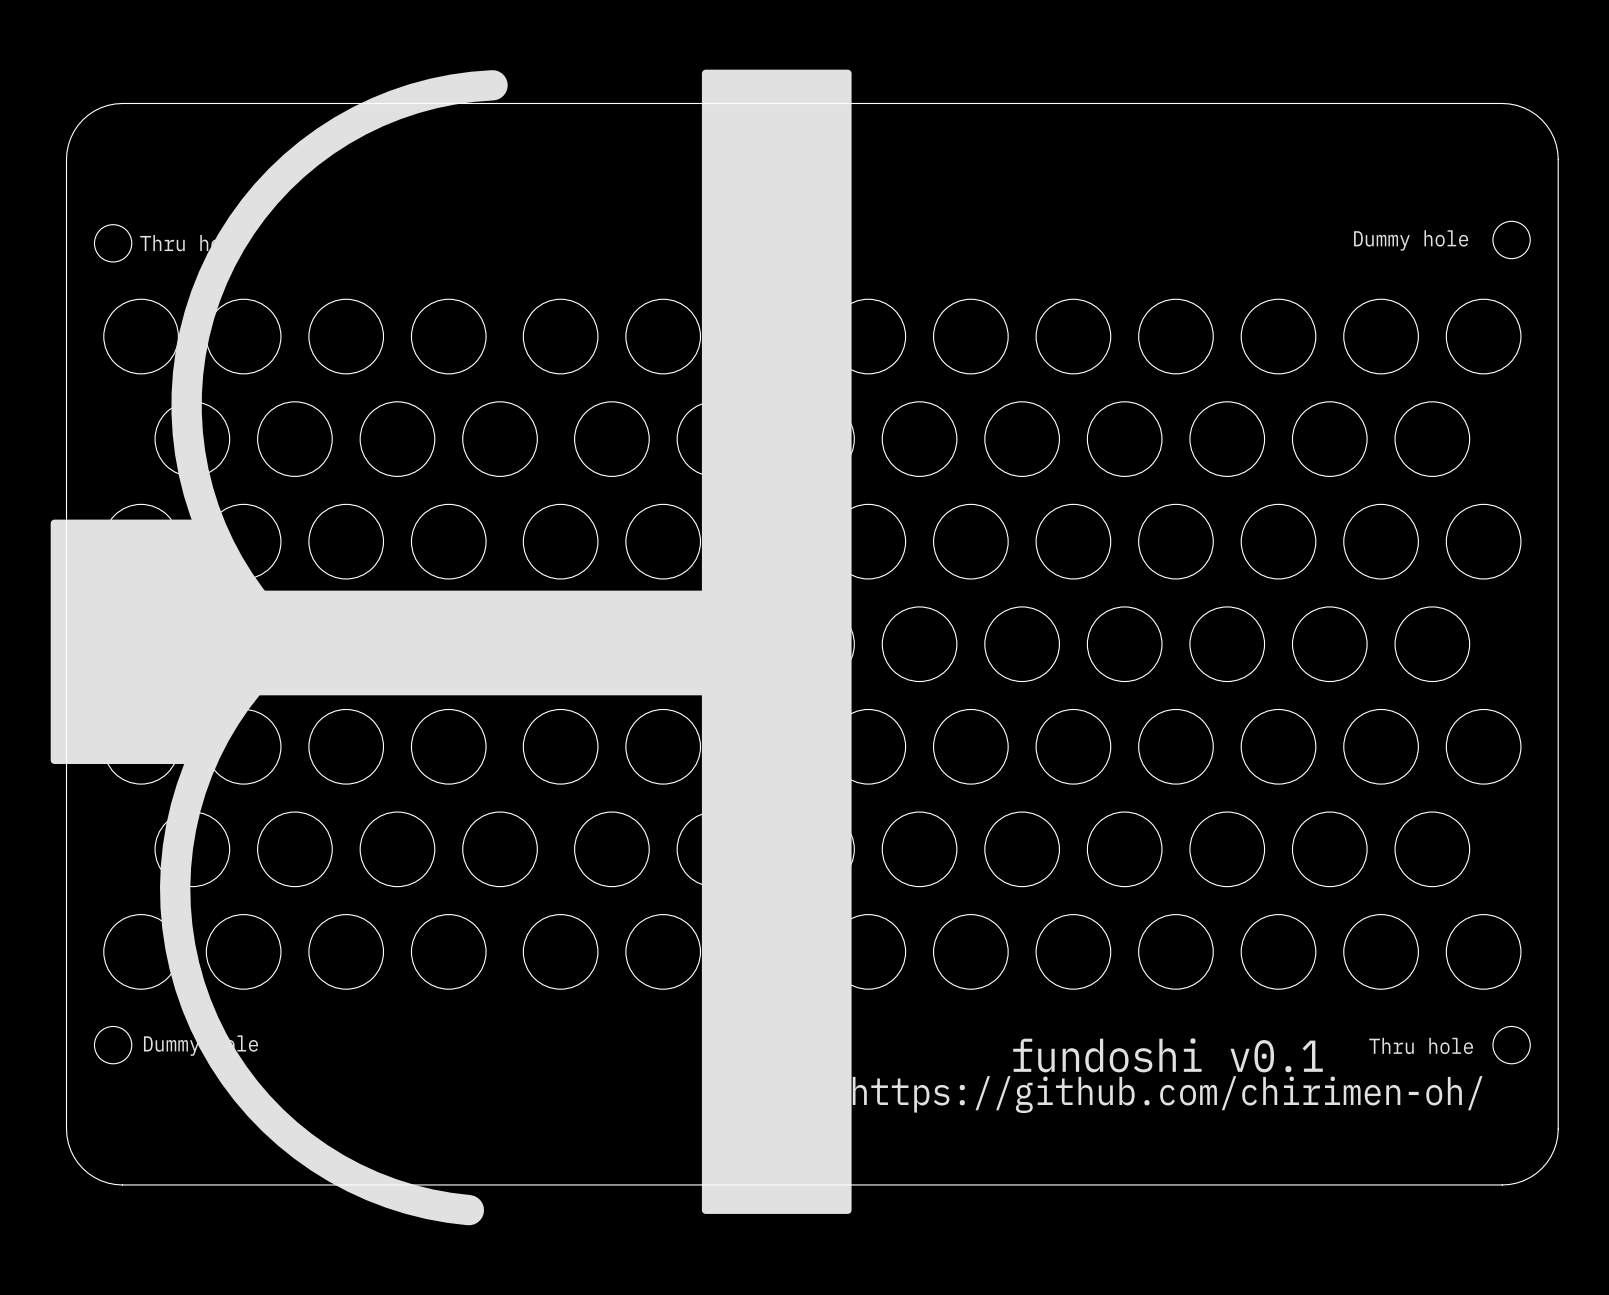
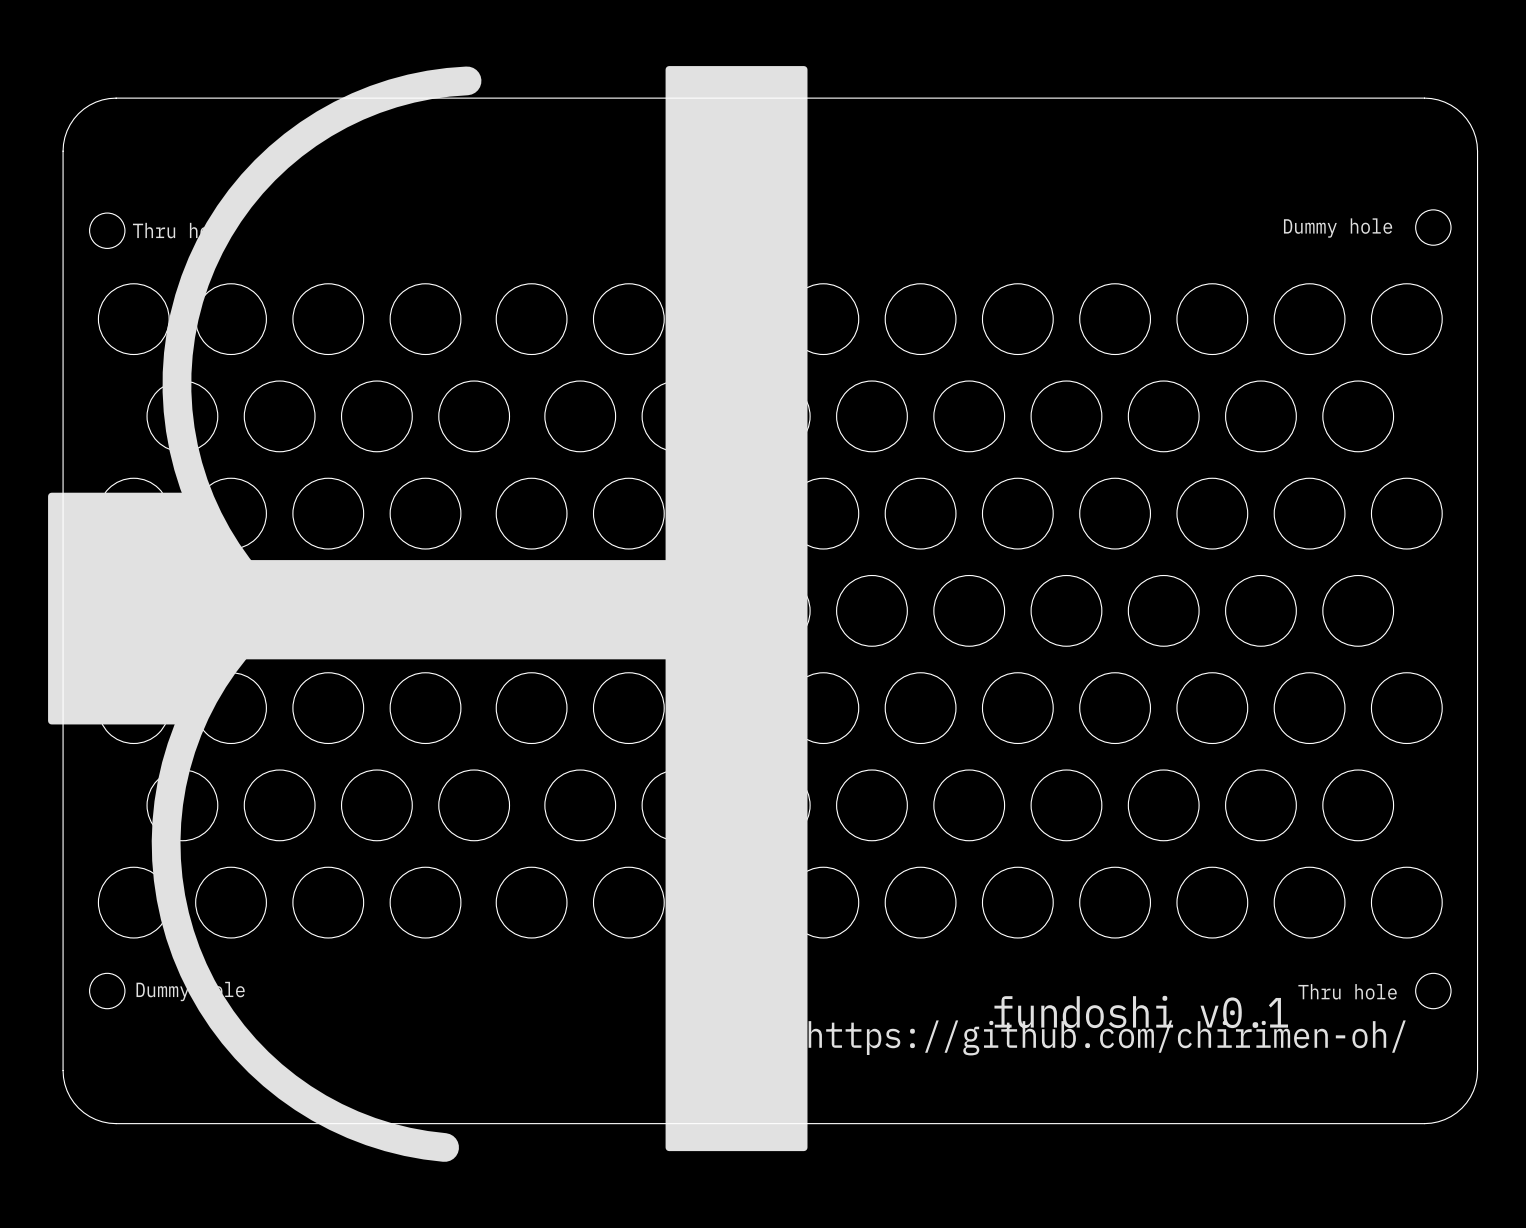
text position: fundoshi v0.1 (1168, 1055) -> fundoshi v0.1 (1141, 1011)

